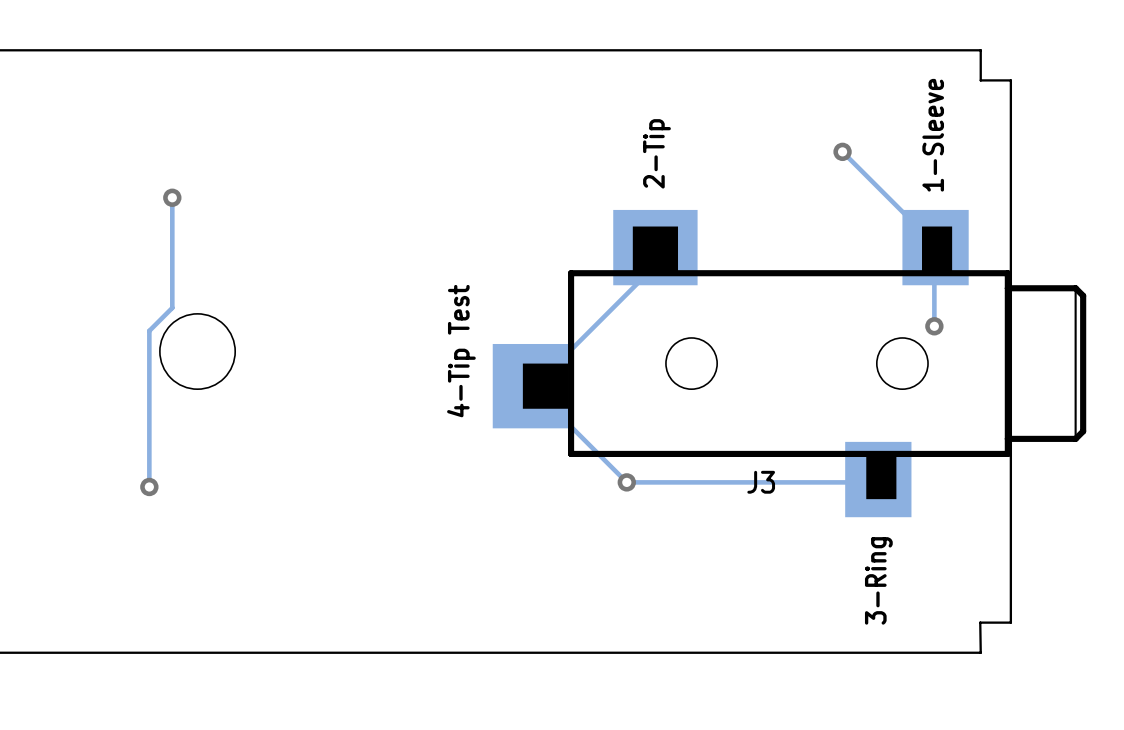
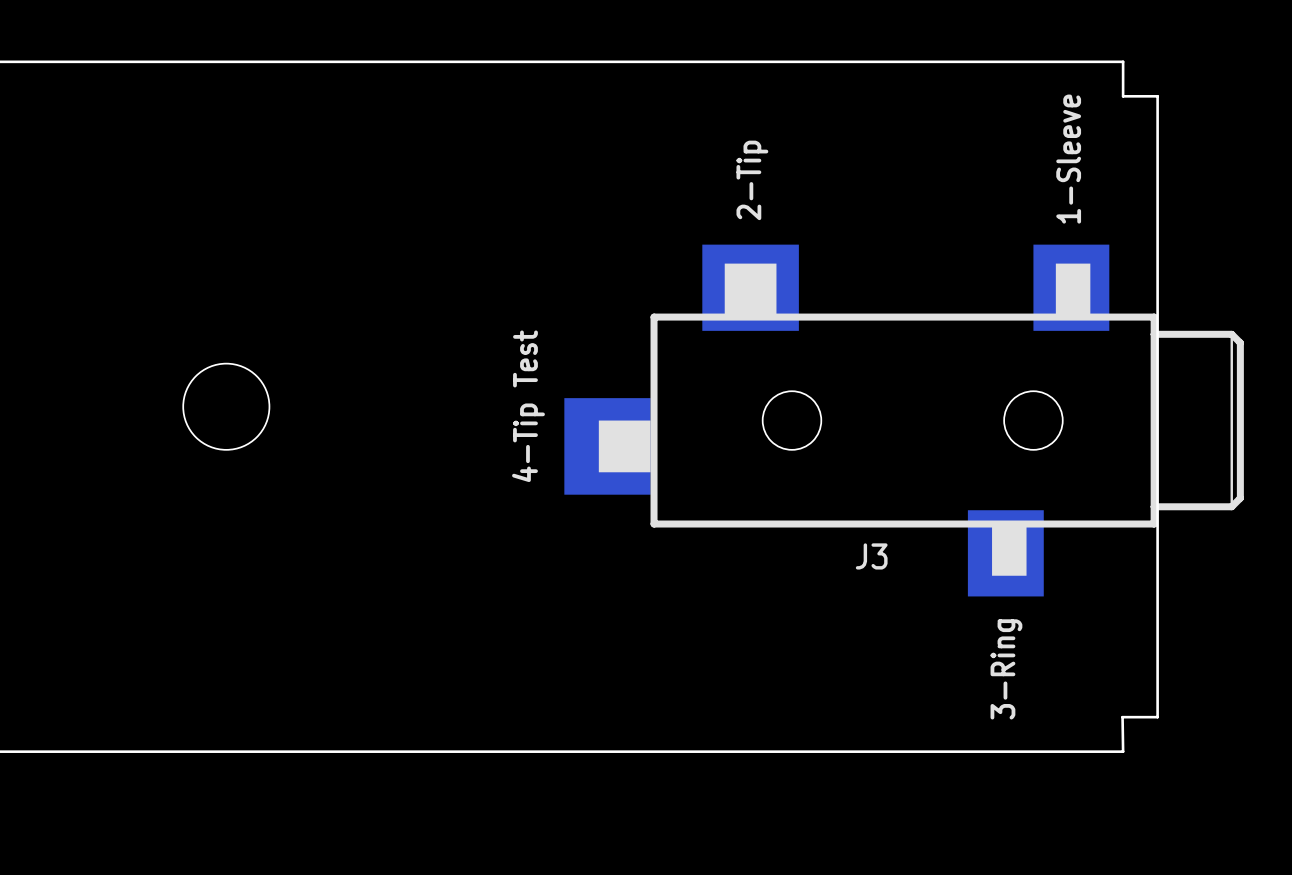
track: (842, 151) (934, 243) (934, 326) -> none
via: (842, 151) -> none
track: (172, 197) (172, 307) (149, 330) (149, 486) -> none
via: (172, 197) -> none
track: (655, 247) (654, 266) (534, 385) (530, 386) (626, 482) (874, 482) (878, 479) -> none
via: (934, 326) -> none
via: (626, 482) -> none
via: (149, 486) -> none

